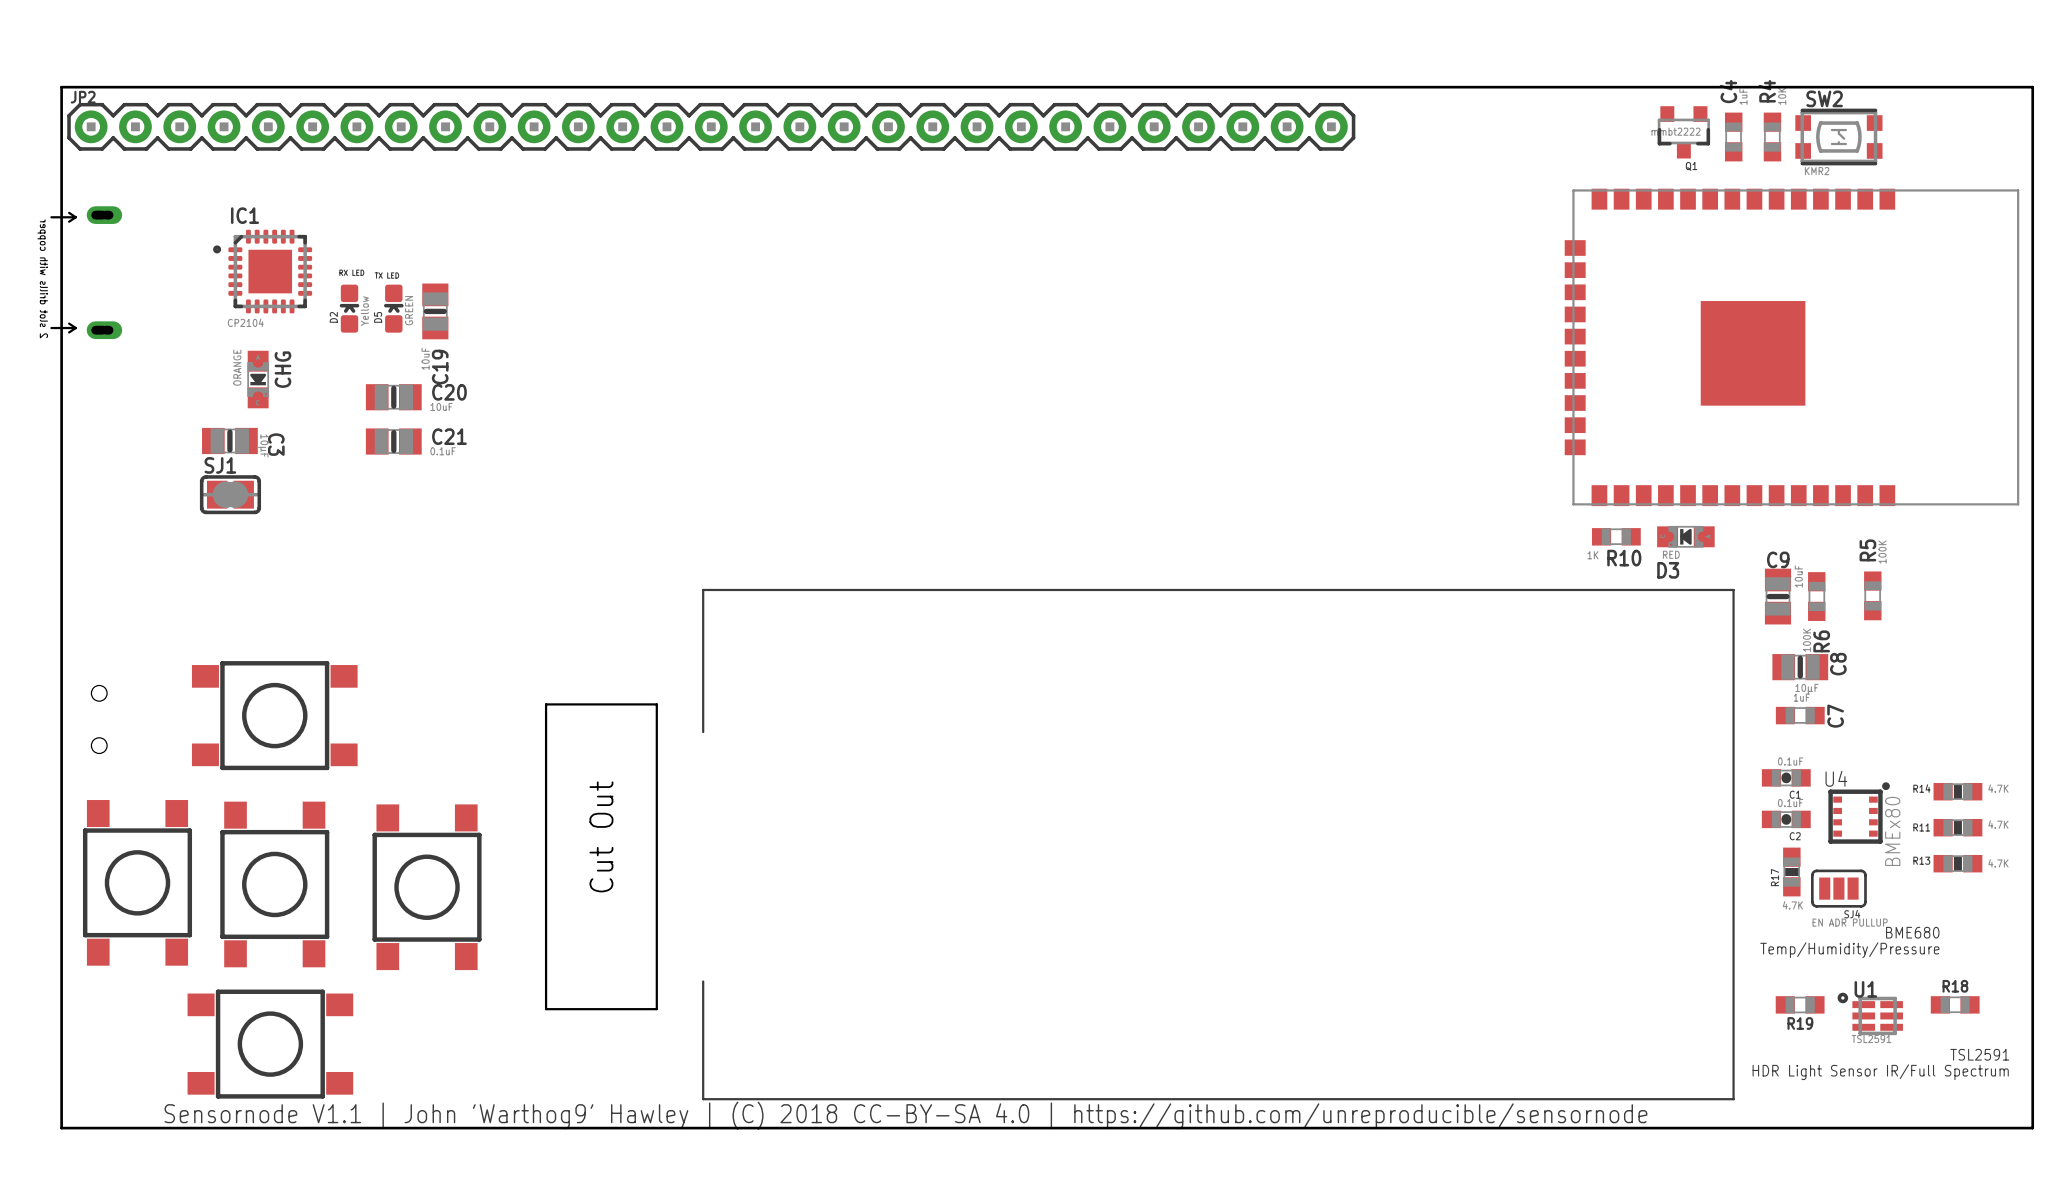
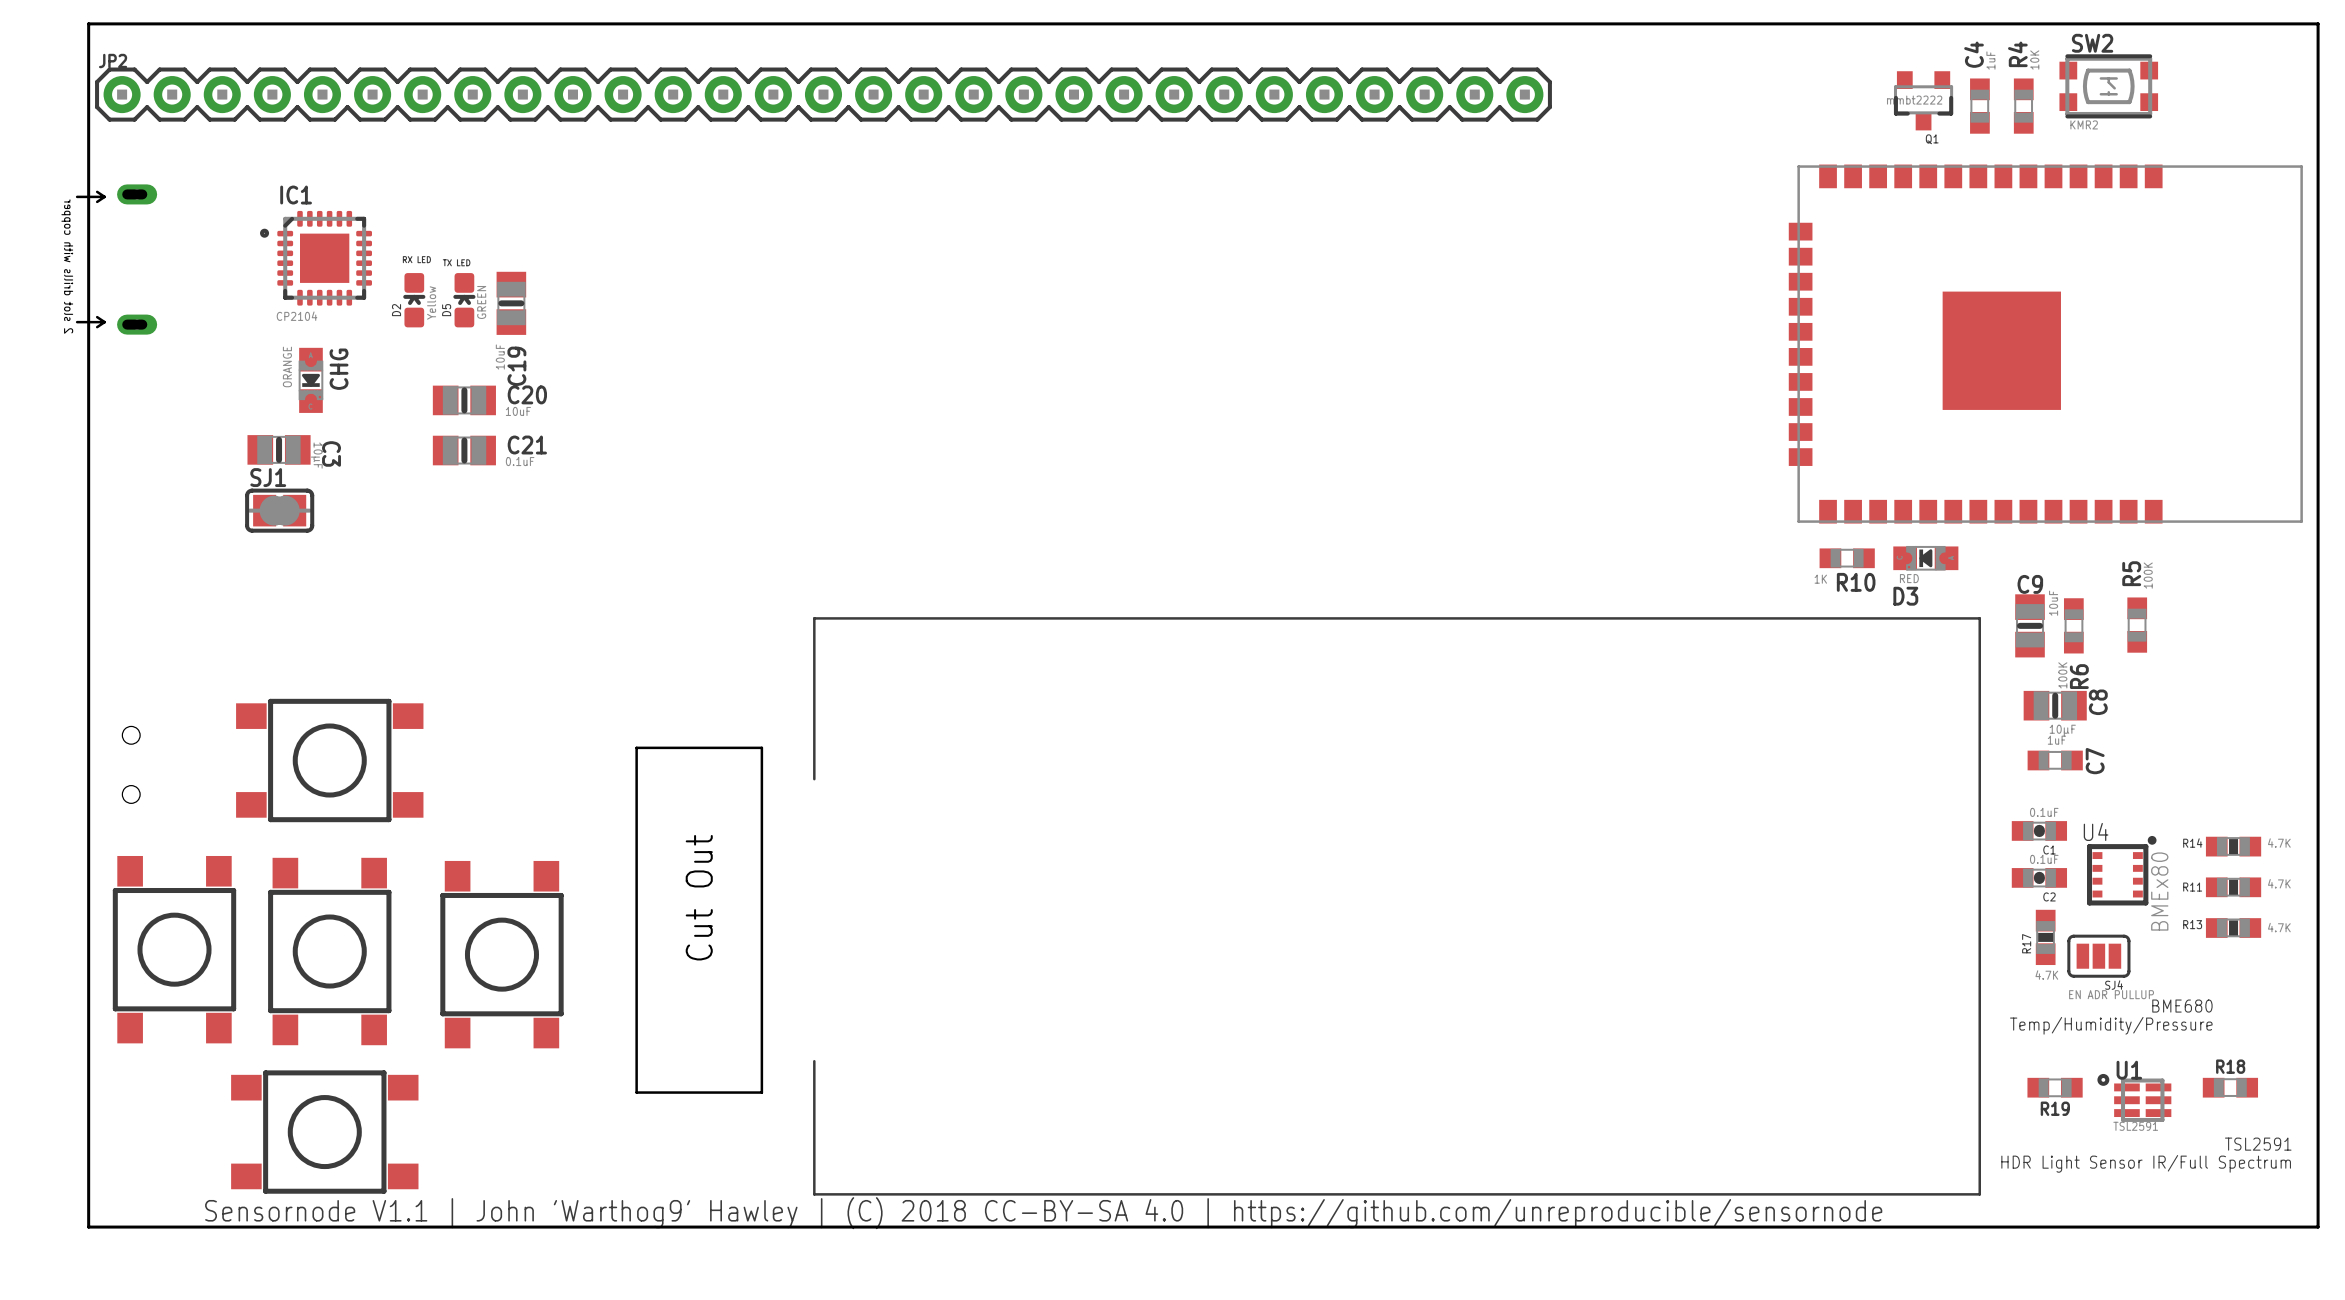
board edge: (61, 87) (2032, 87) -> (88, 49) (88, 23) (2318, 23) (2318, 49)
SW2 position: (1838, 137) -> (2108, 86)

